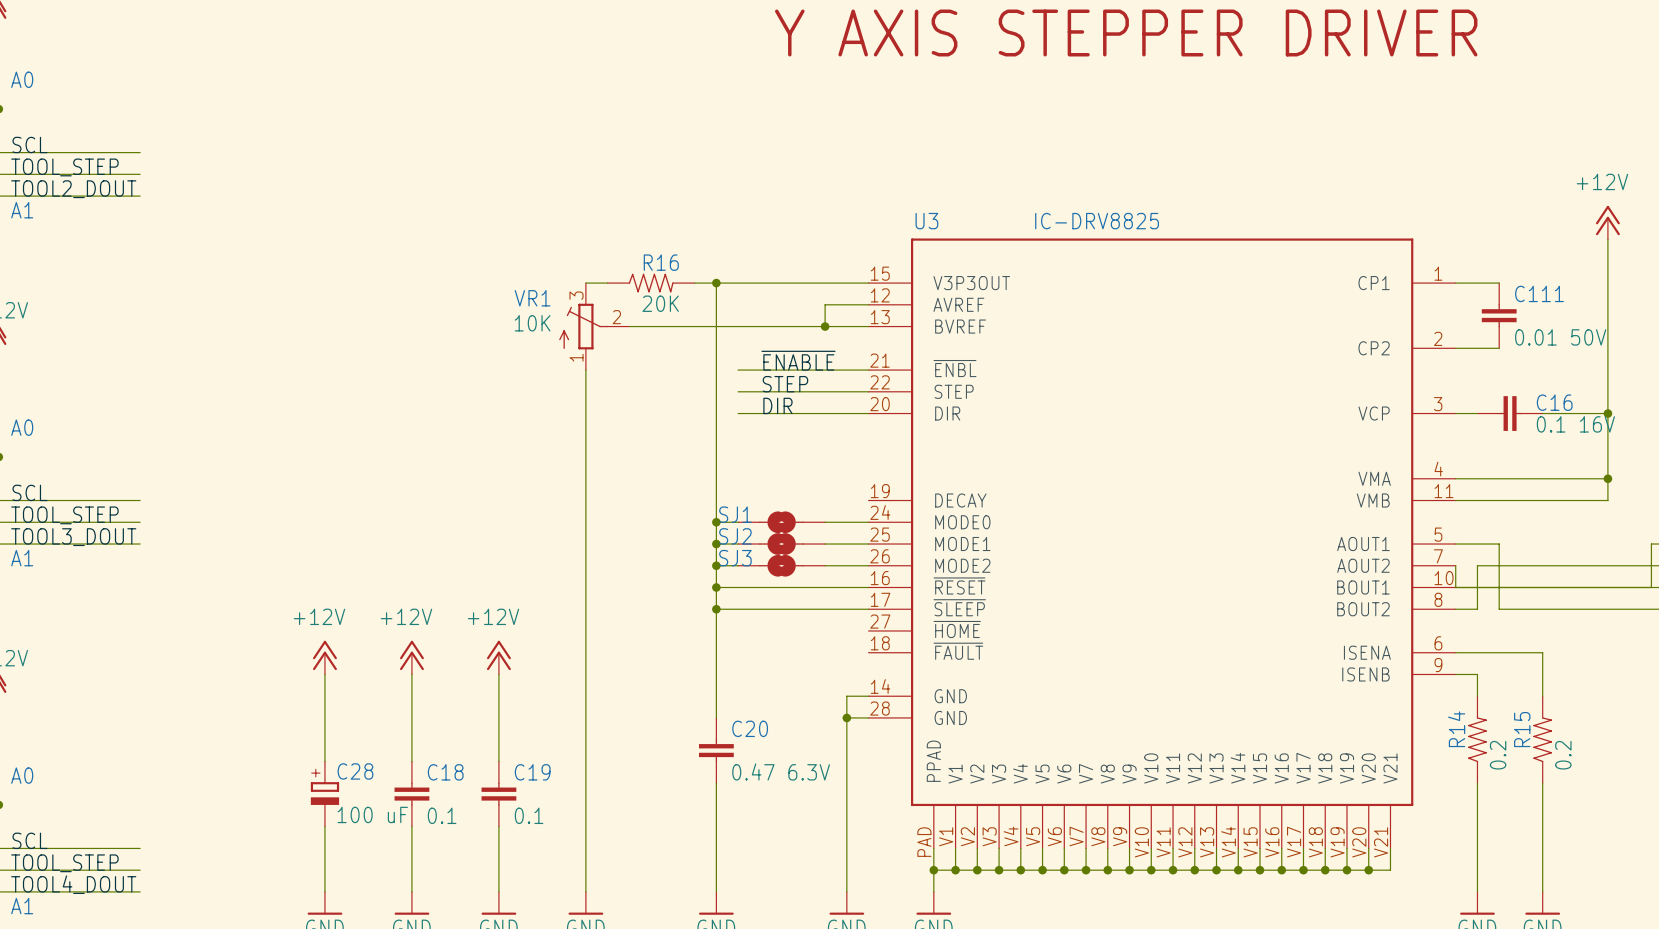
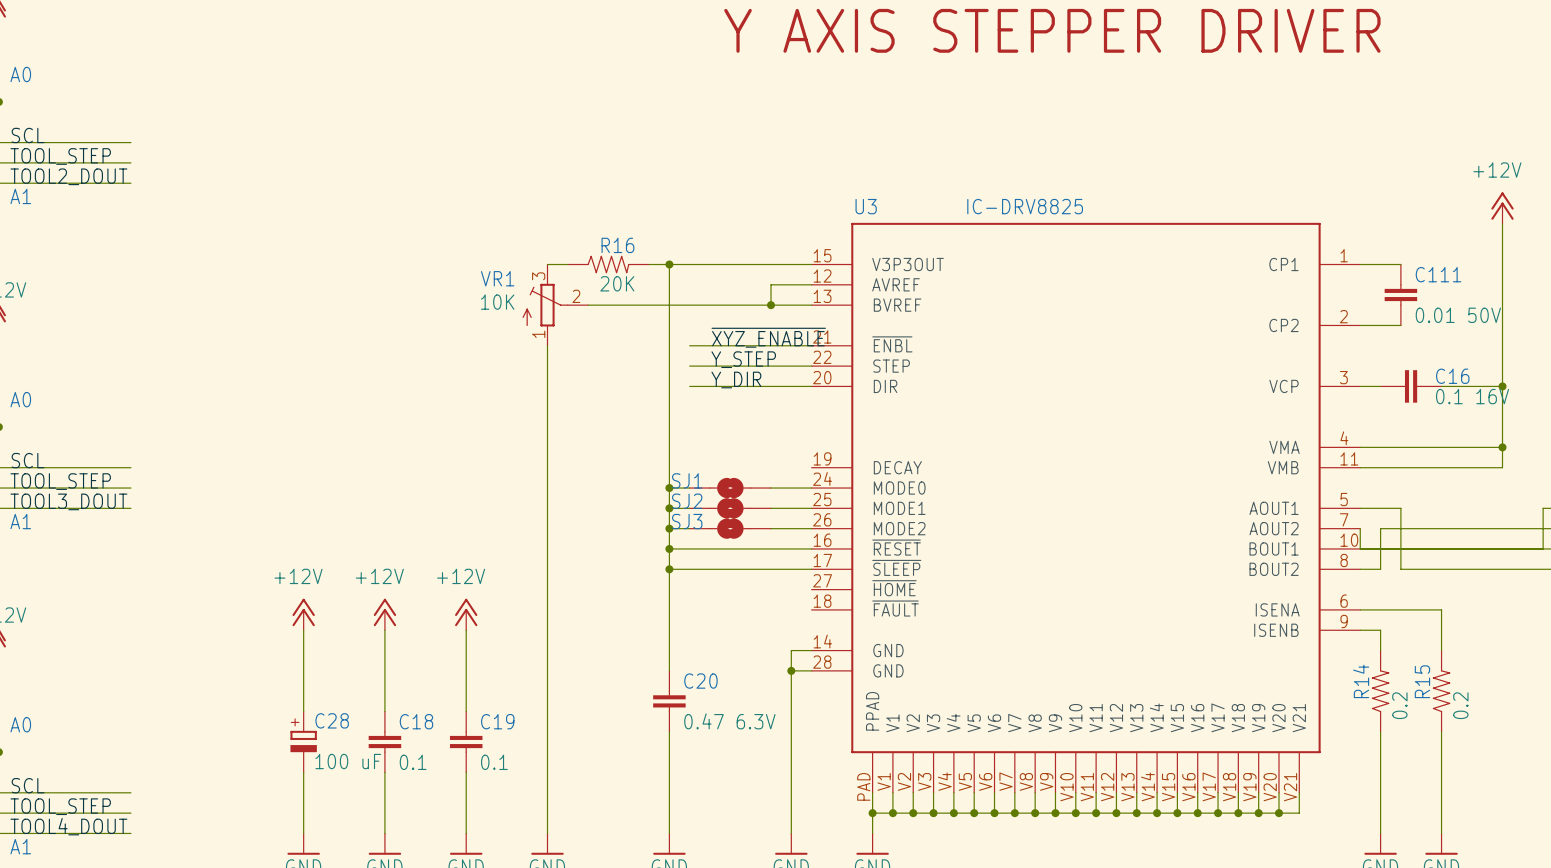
label: ~{ENABLE} (798, 360) -> ~{XYZ_ENABLE} (768, 337)
label: STEP (785, 384) -> Y_STEP (743, 359)
label: DIR (777, 405) -> Y_DIR (736, 379)

